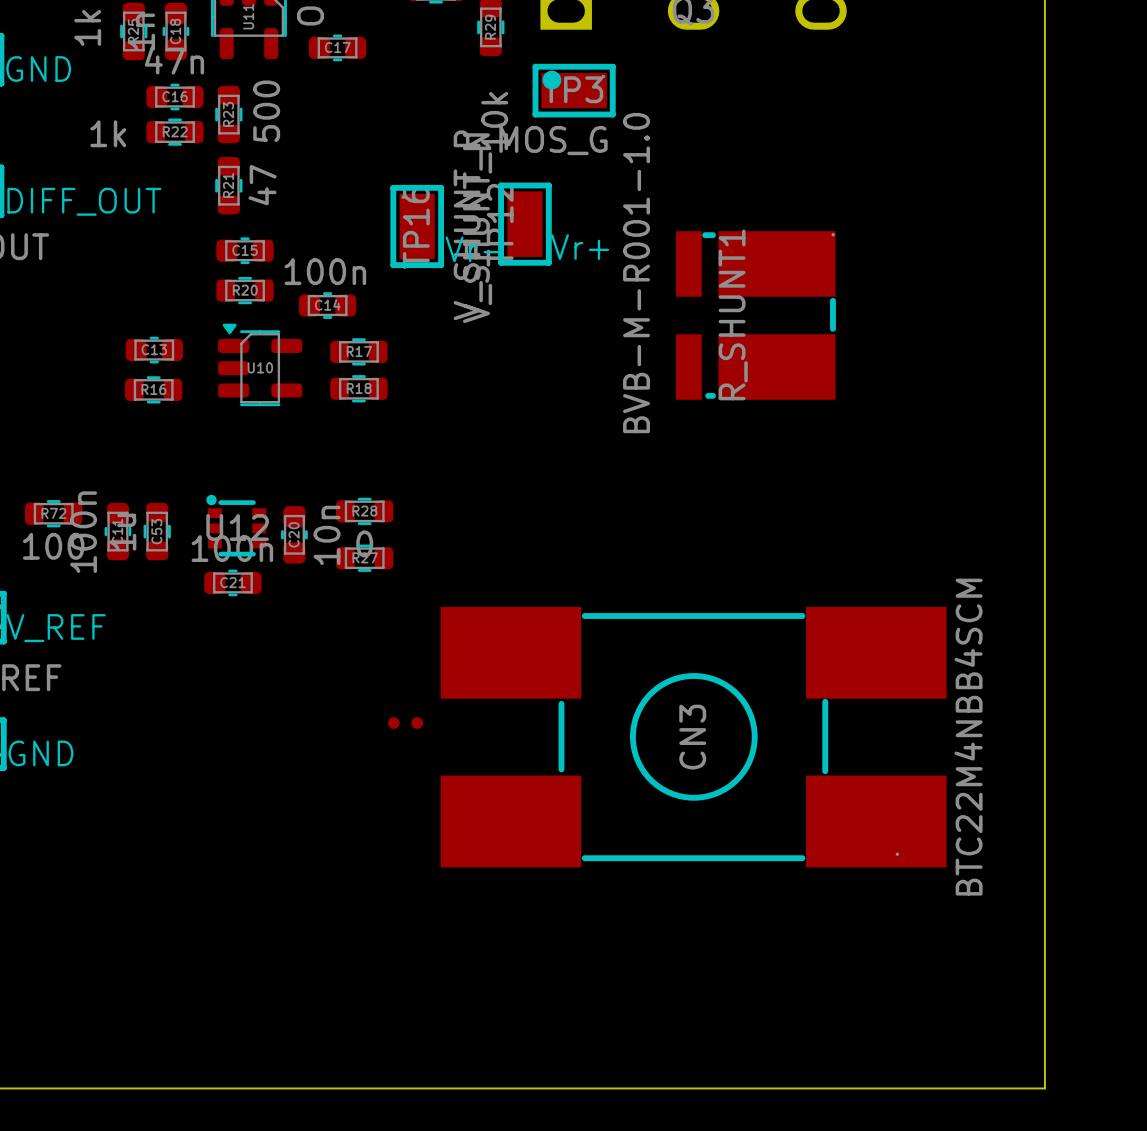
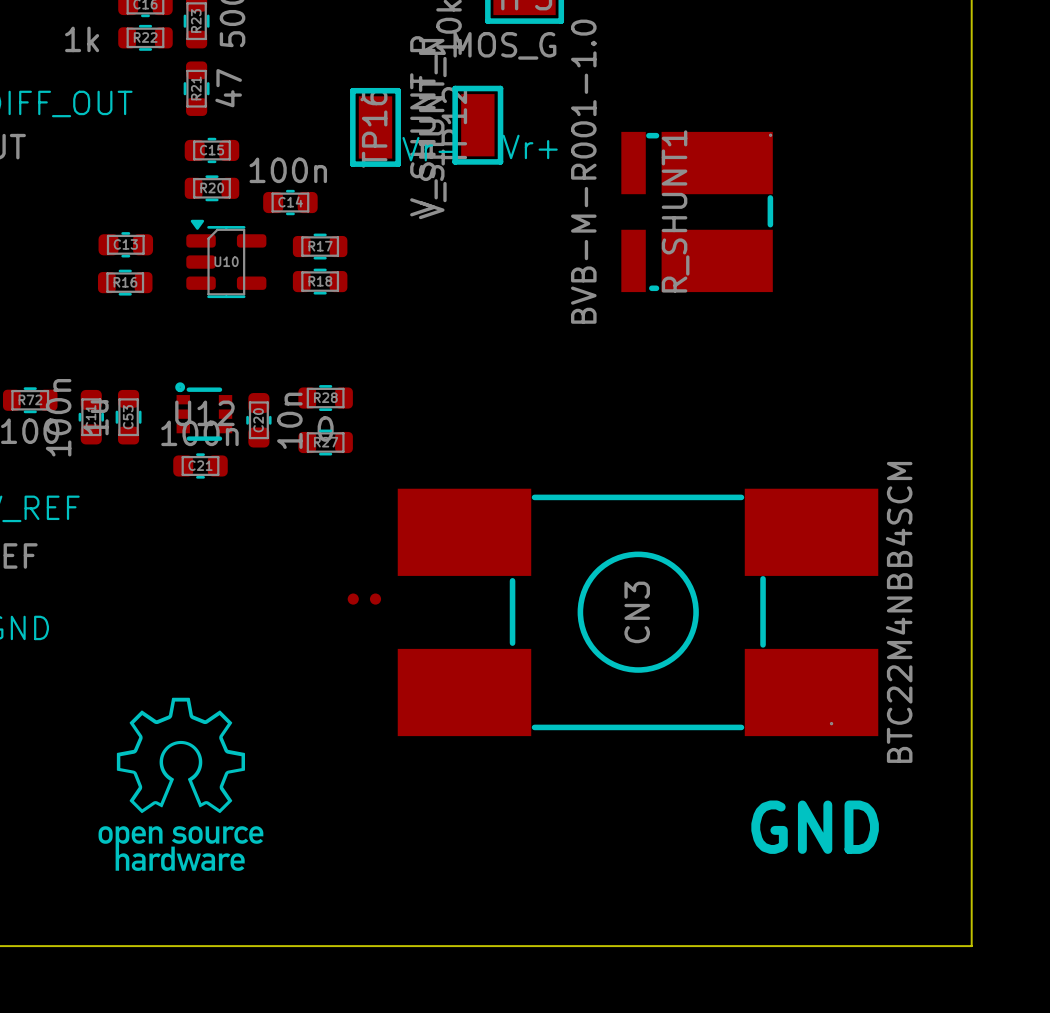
drawing: none -> [98, 697, 264, 871]
text: none -> GND (815, 827)

